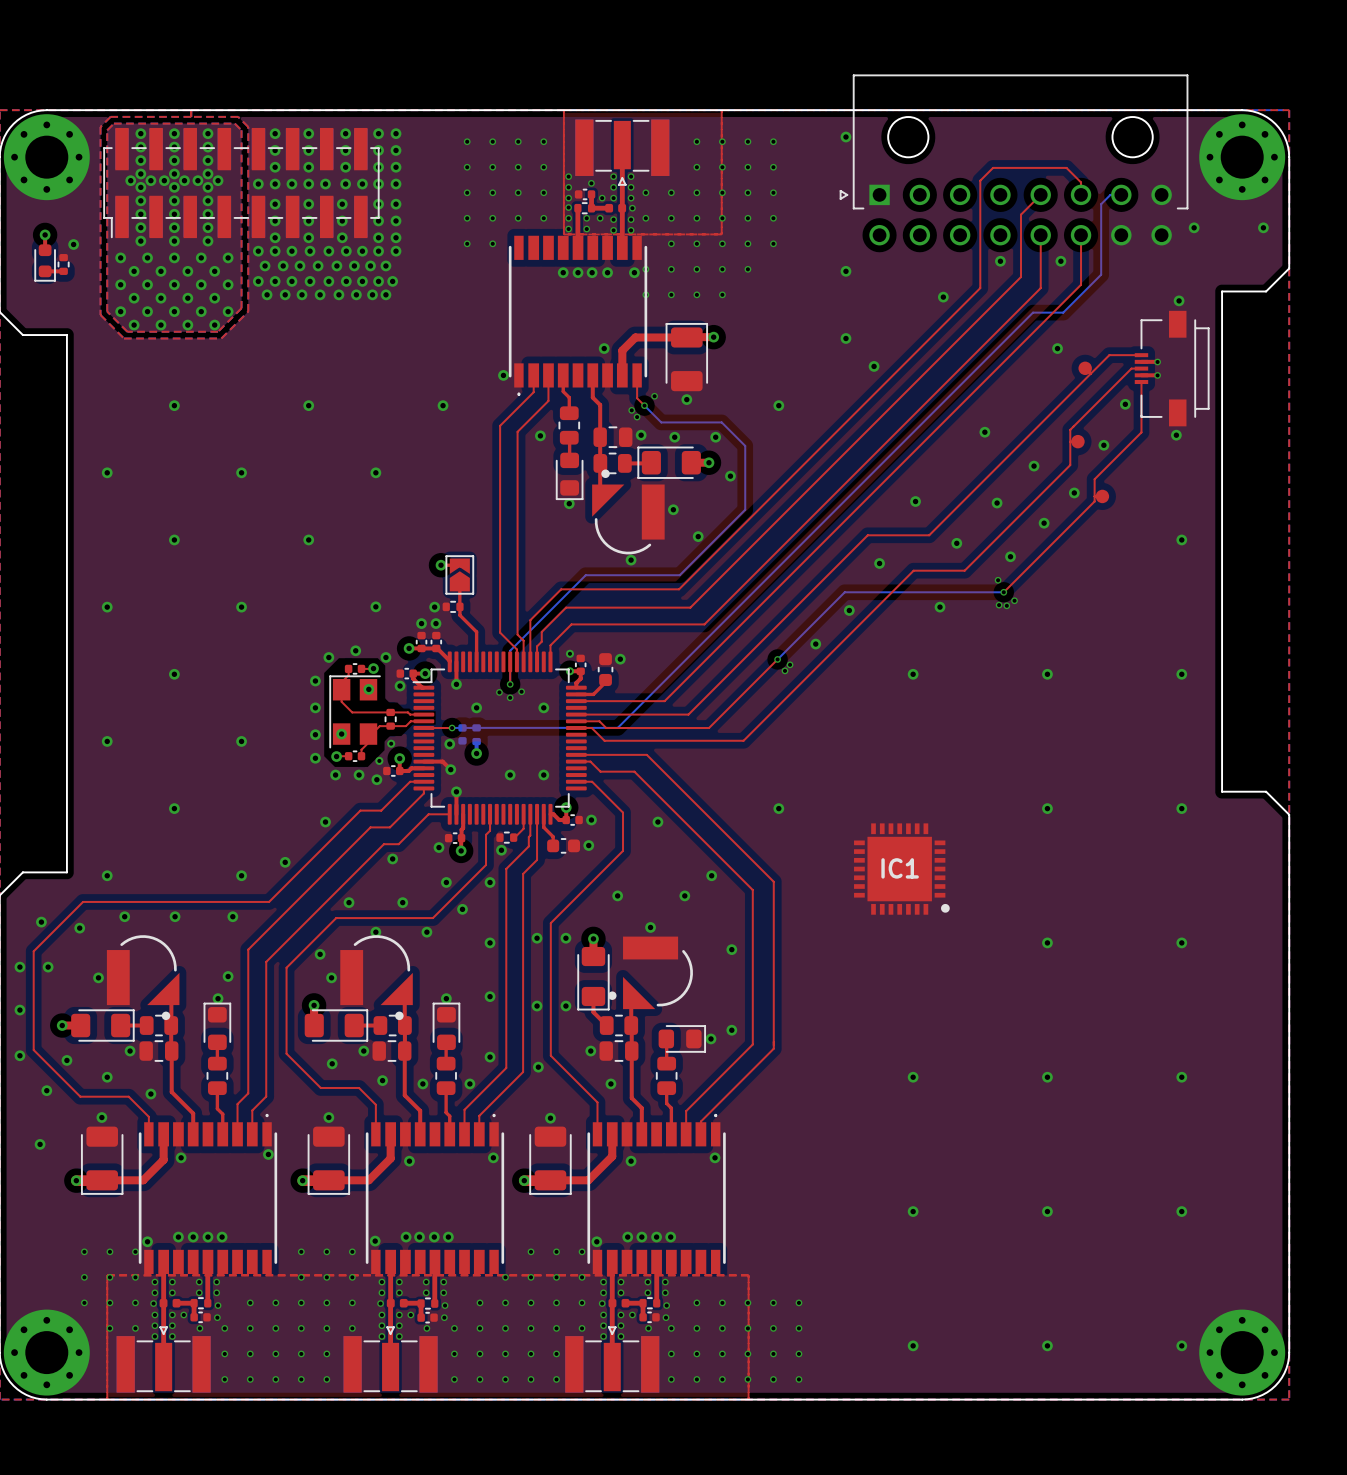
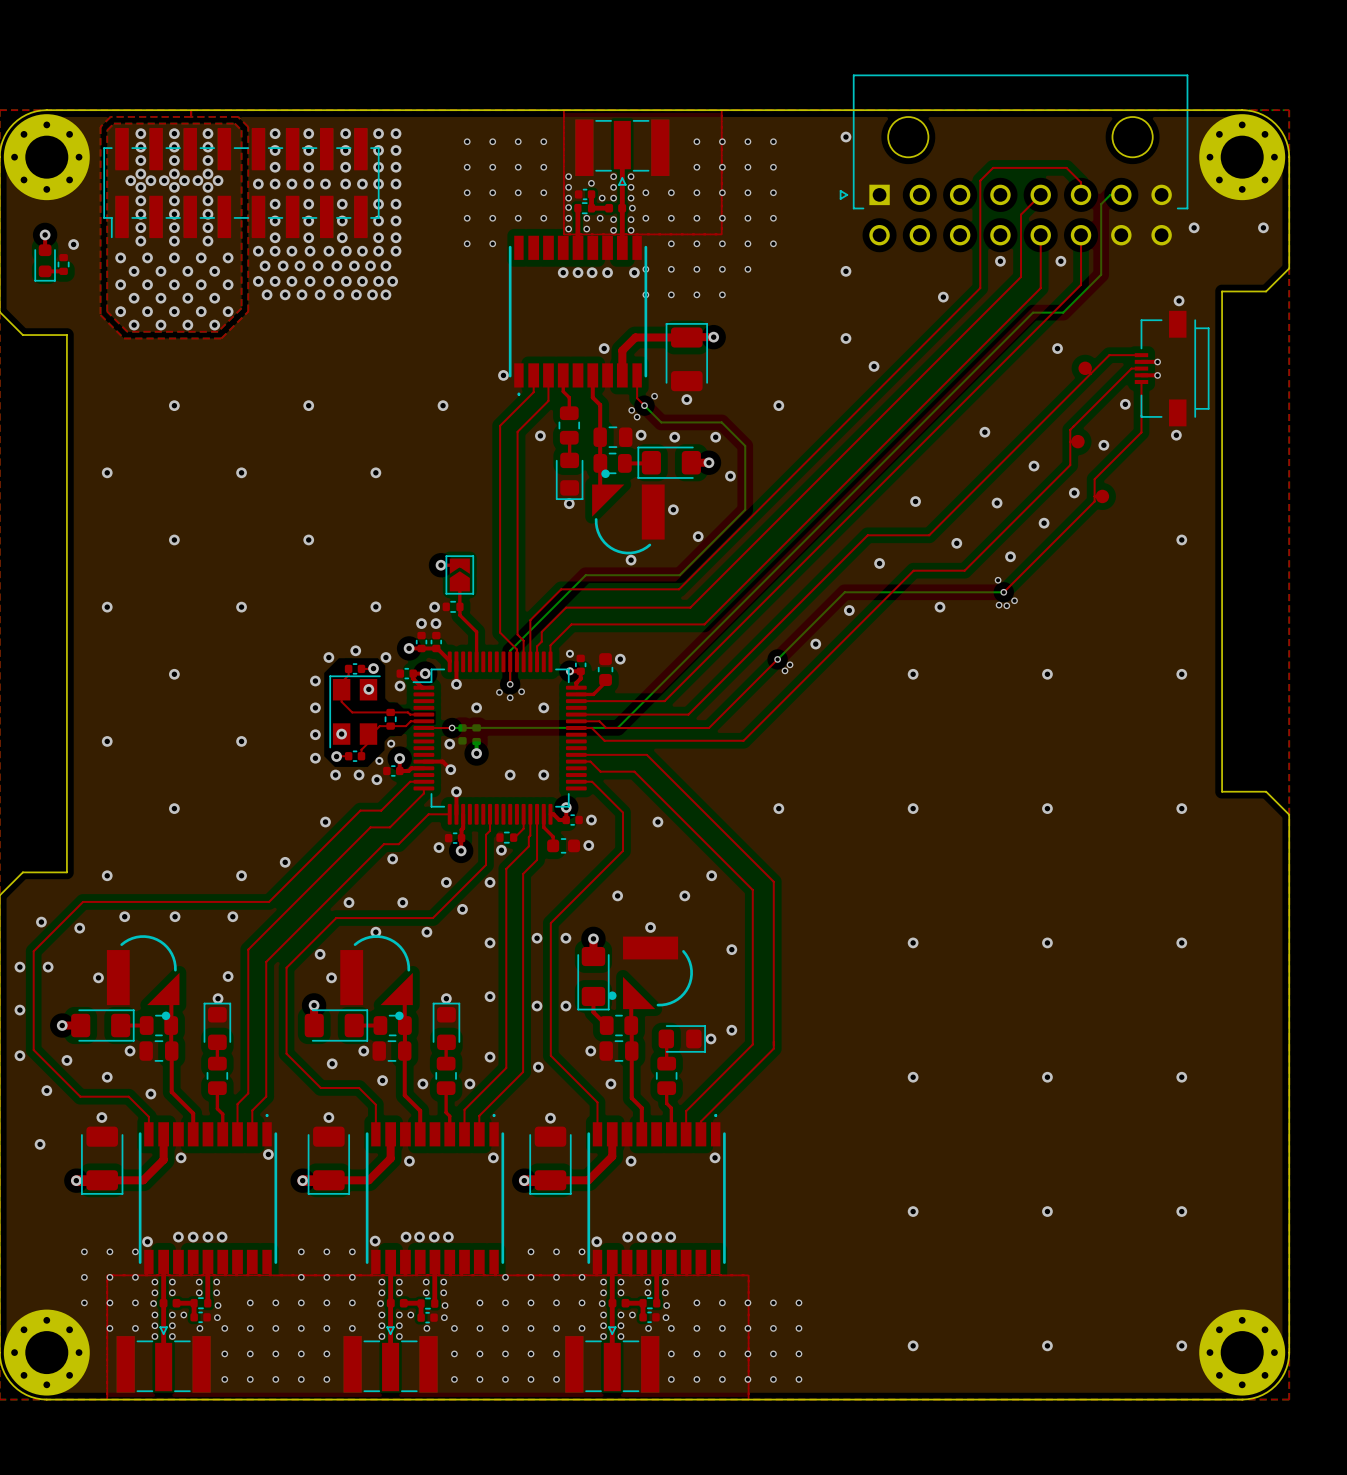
via: none -> (913, 808)
IC1: (901, 869) -> none
via: none -> (913, 942)

